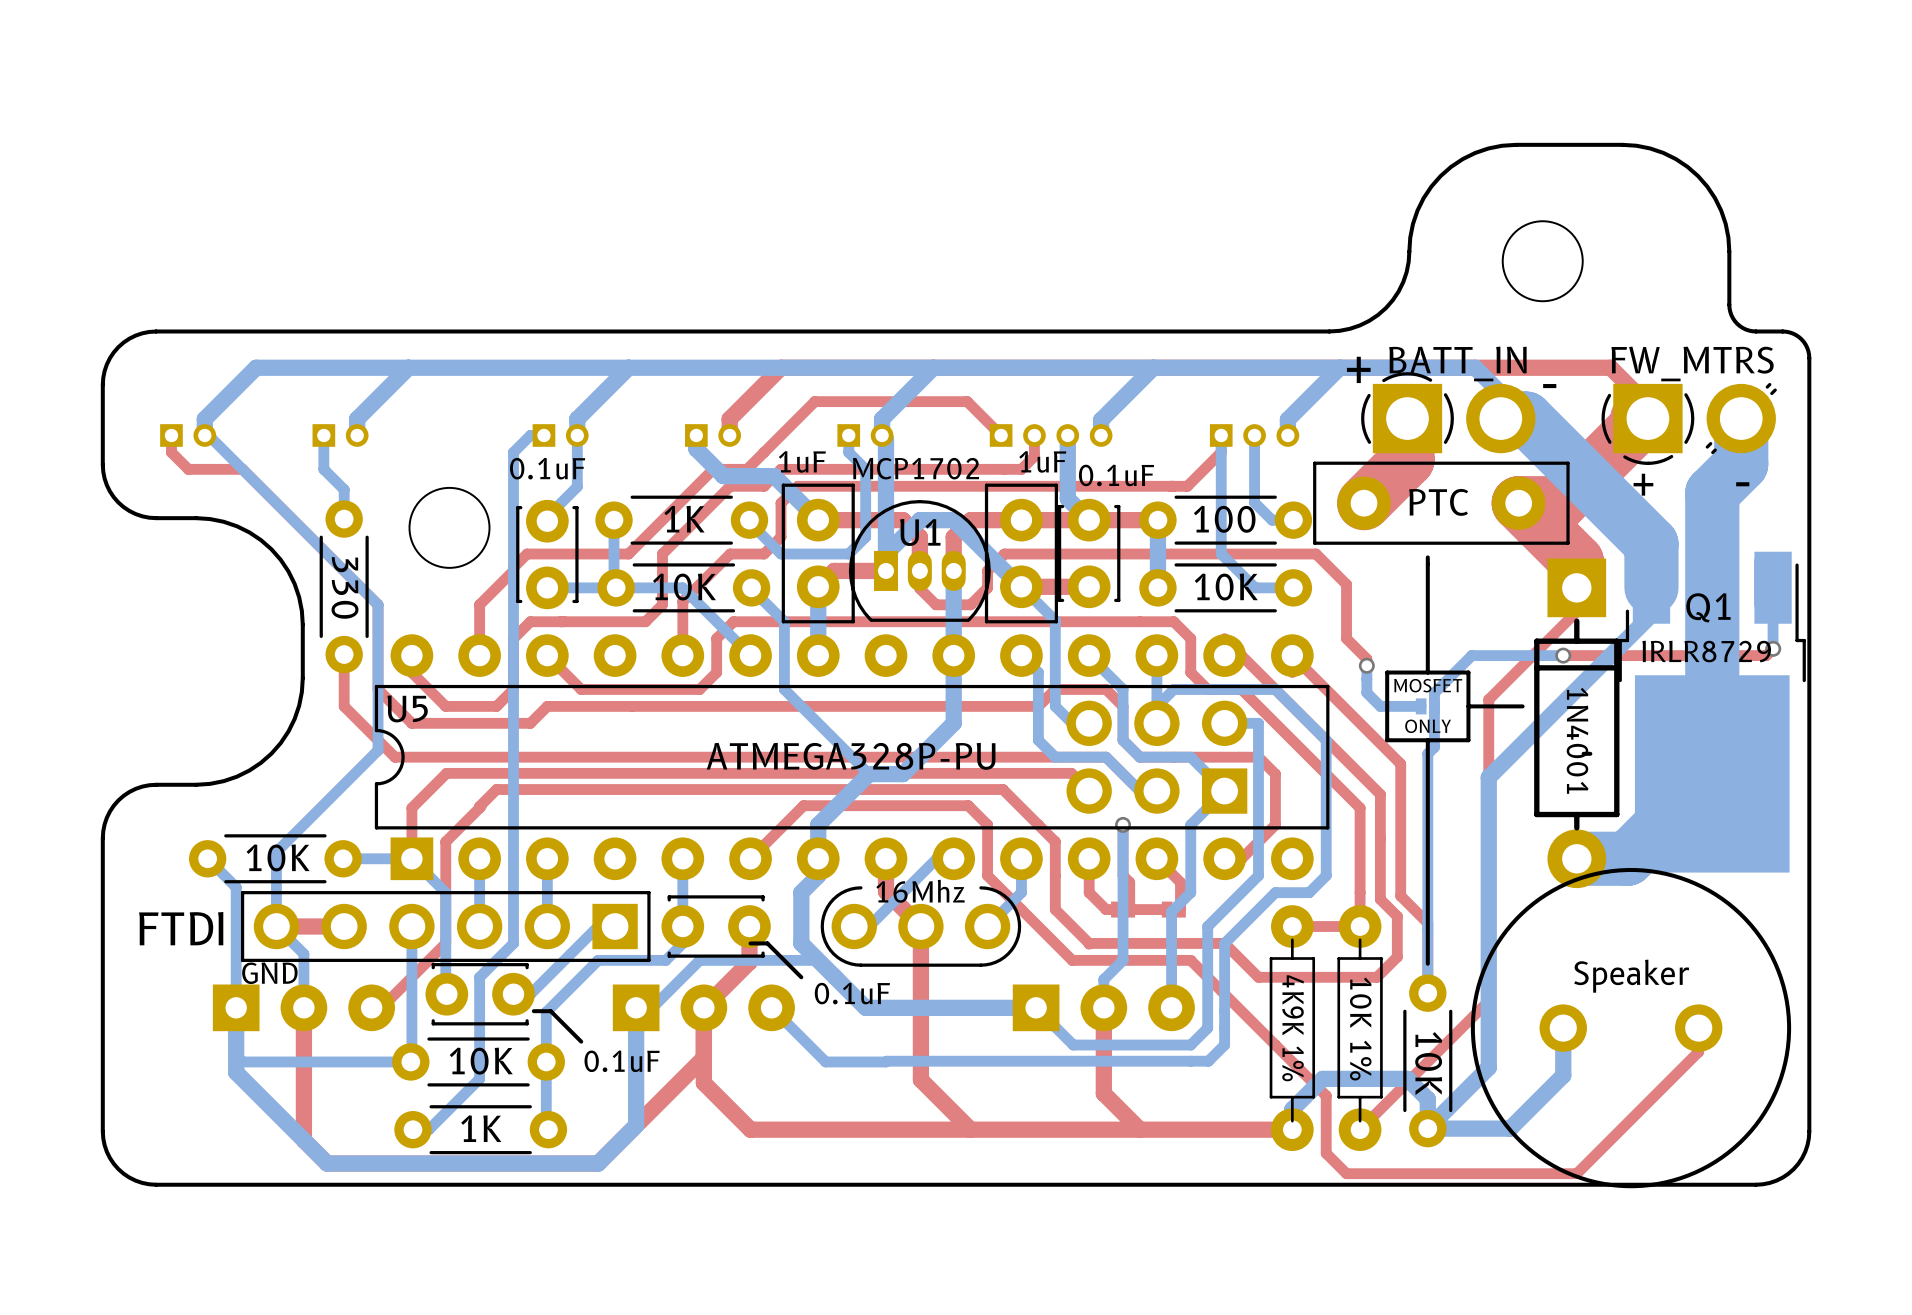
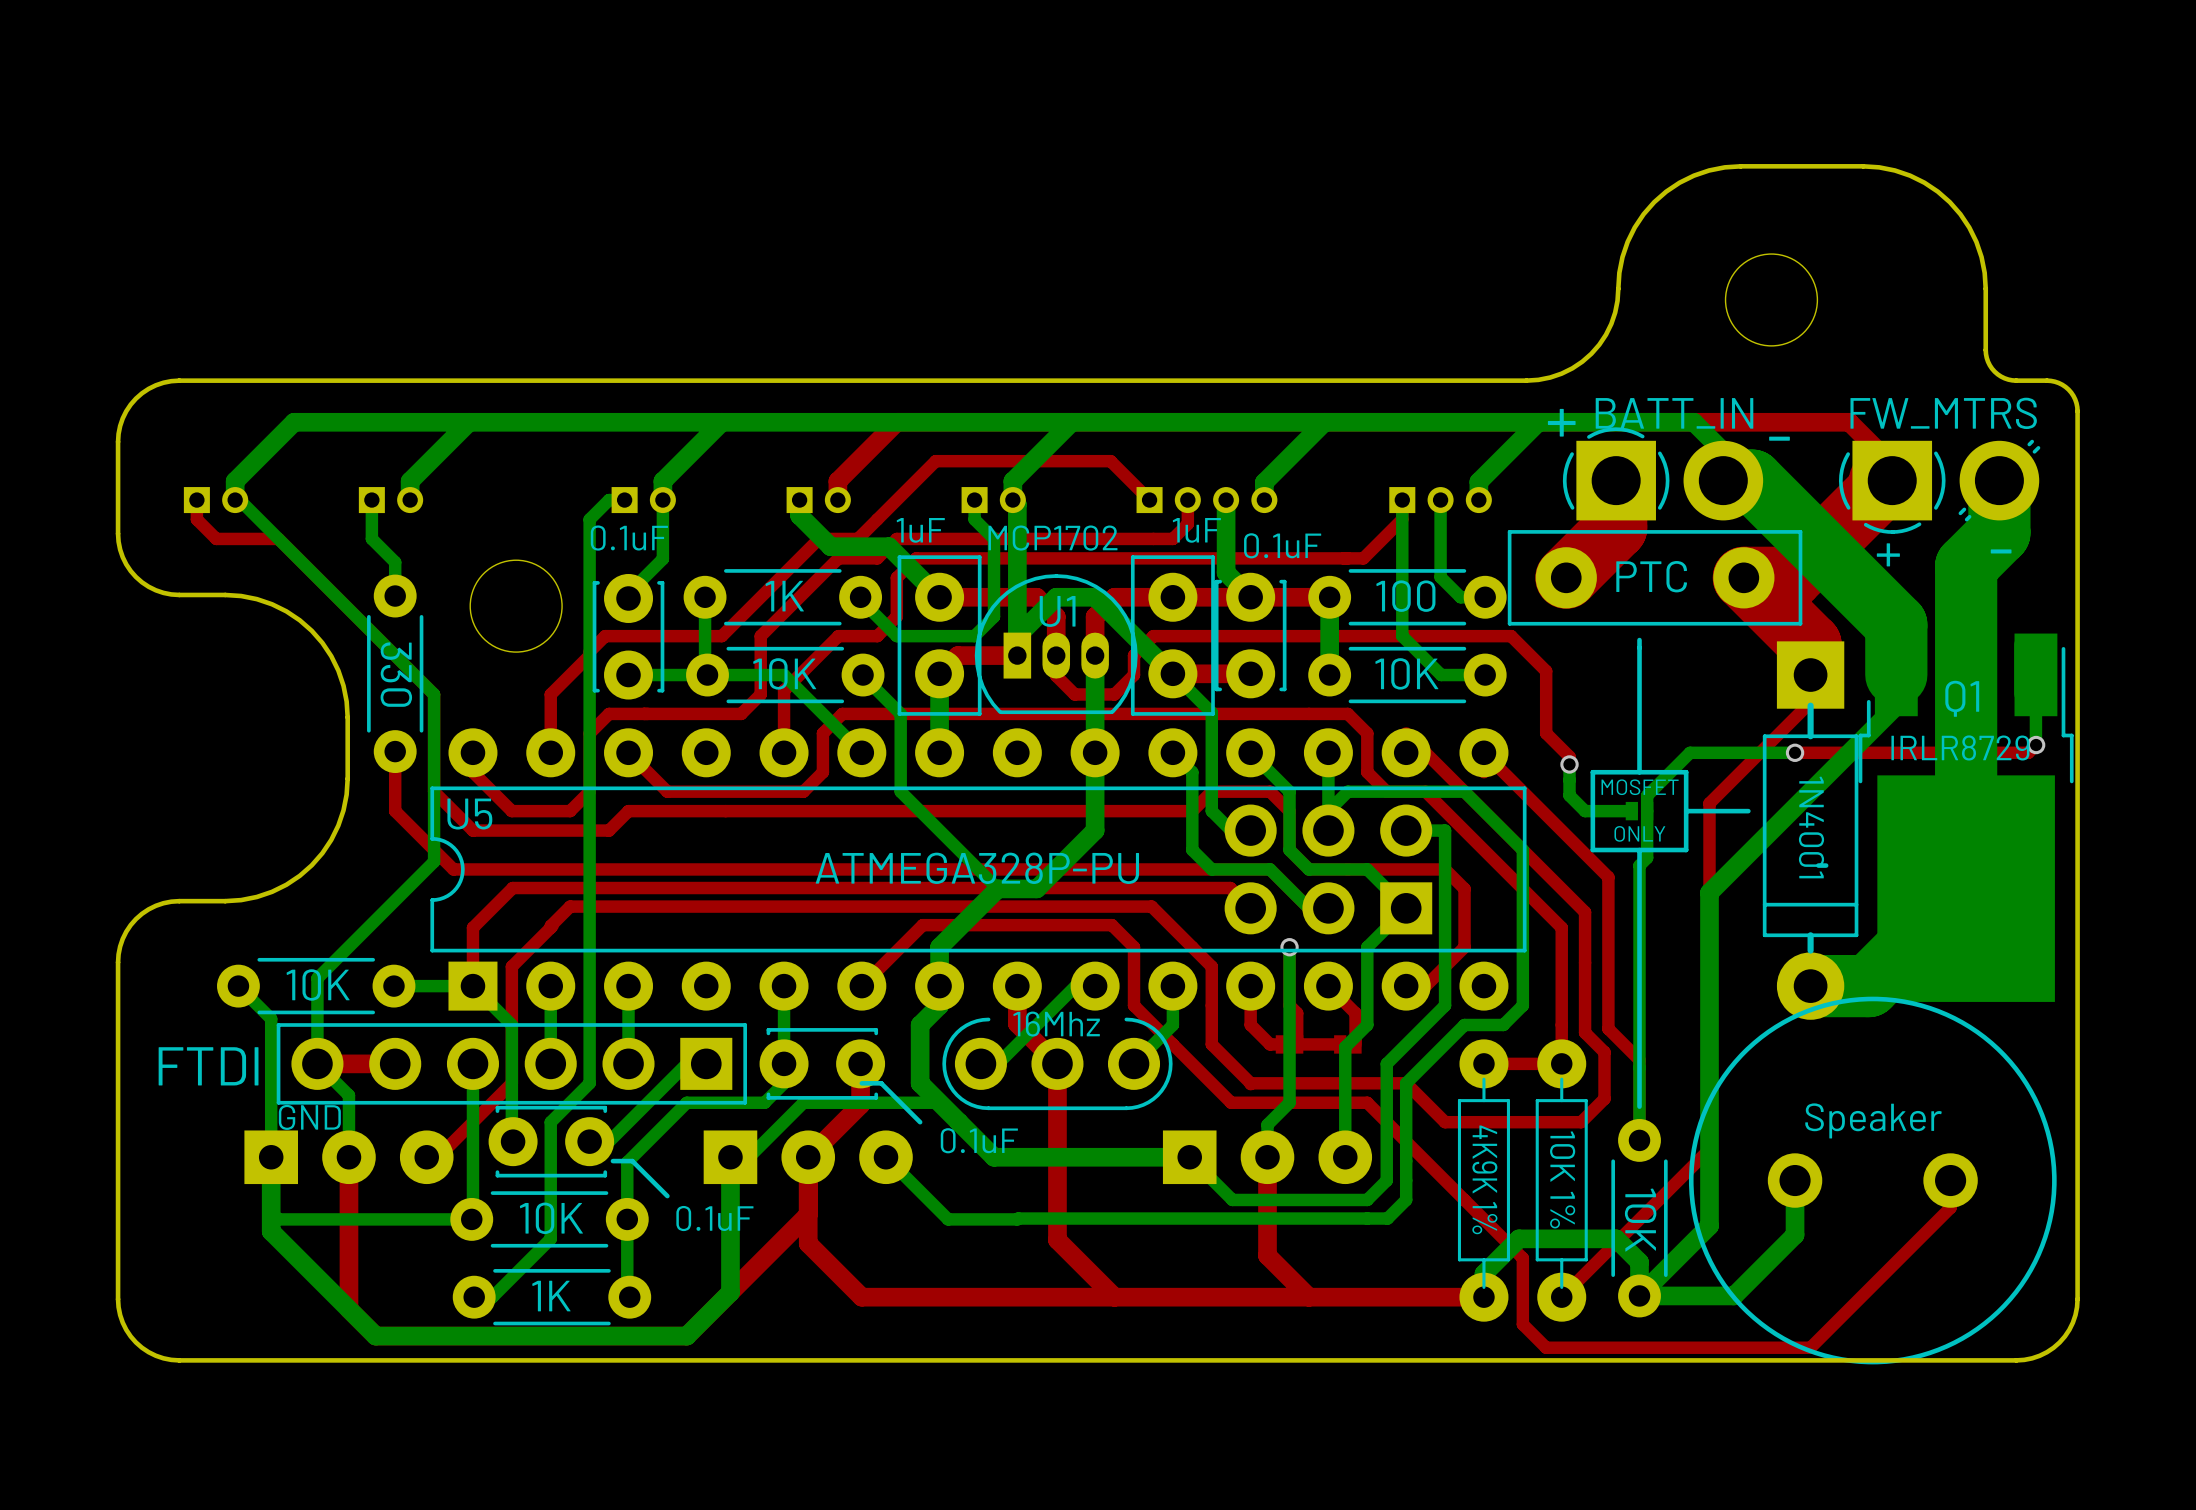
part footprint: [1534, 558, 1620, 889] -> [1762, 641, 1859, 1020]

